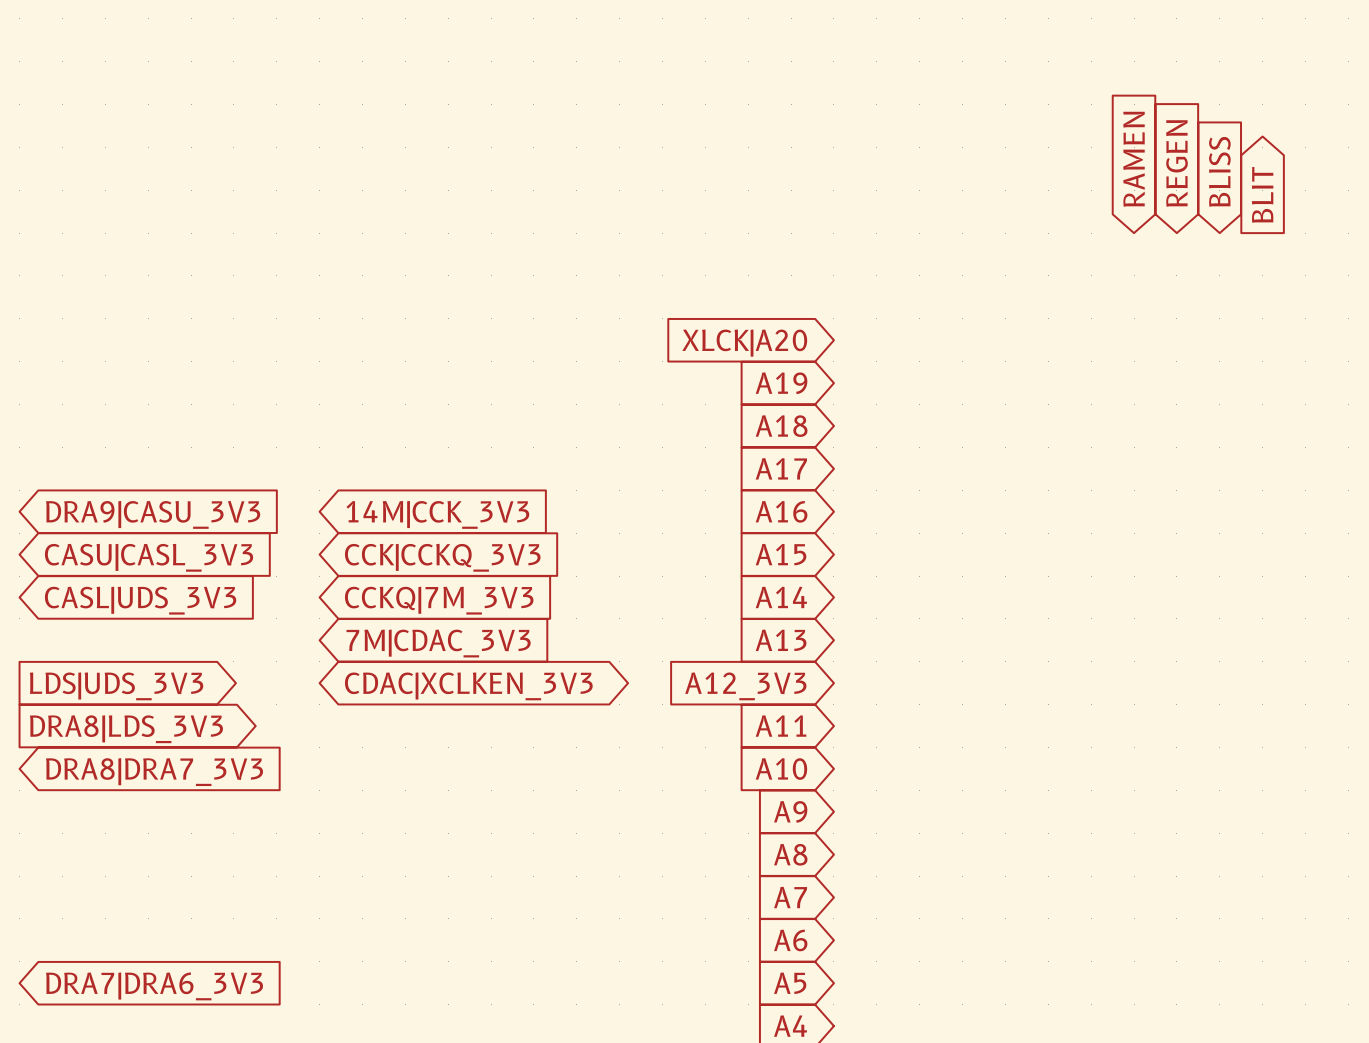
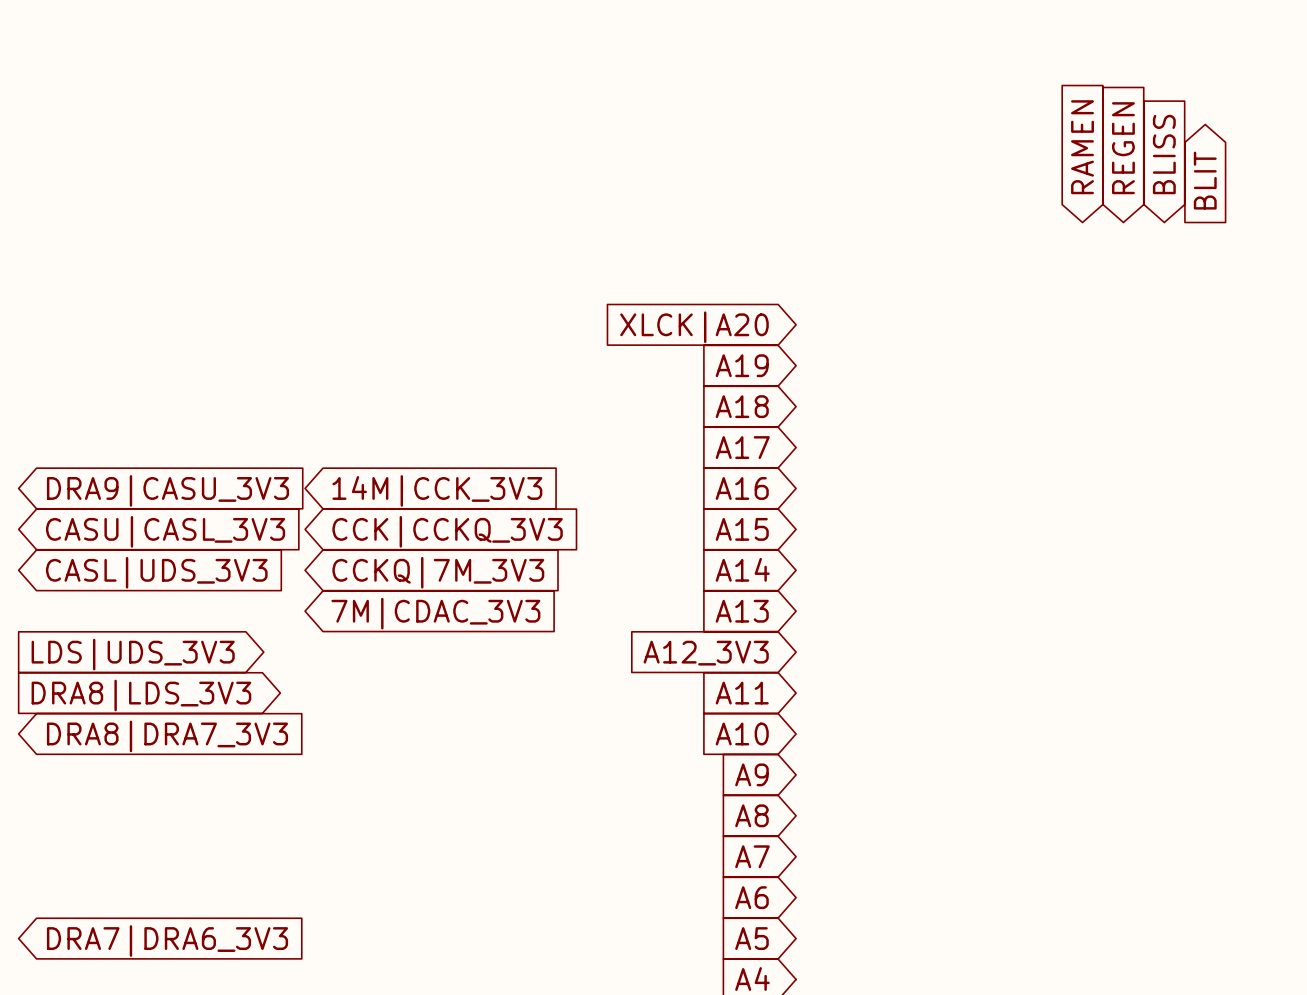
global label: CDAC|XCLKEN_3V3 (468, 686) -> none

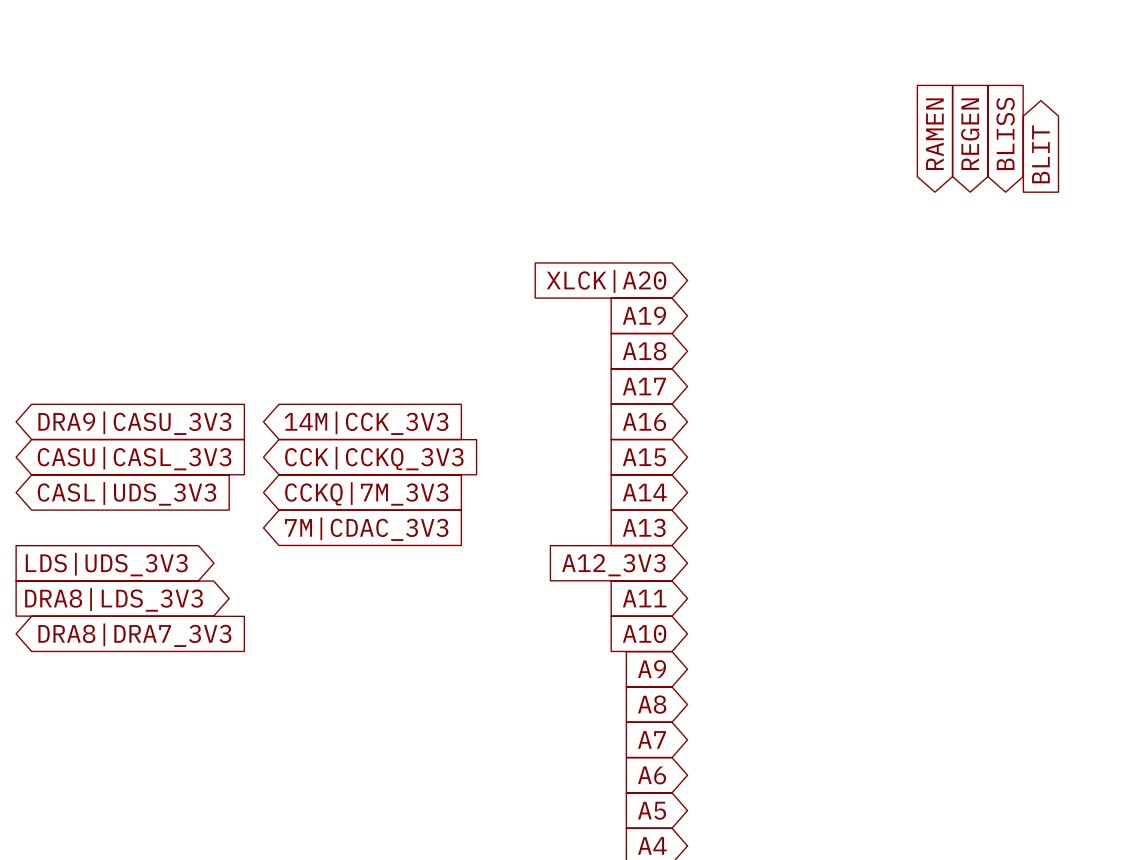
global label: DRA7|DRA6_3V3 (167, 941) -> none

